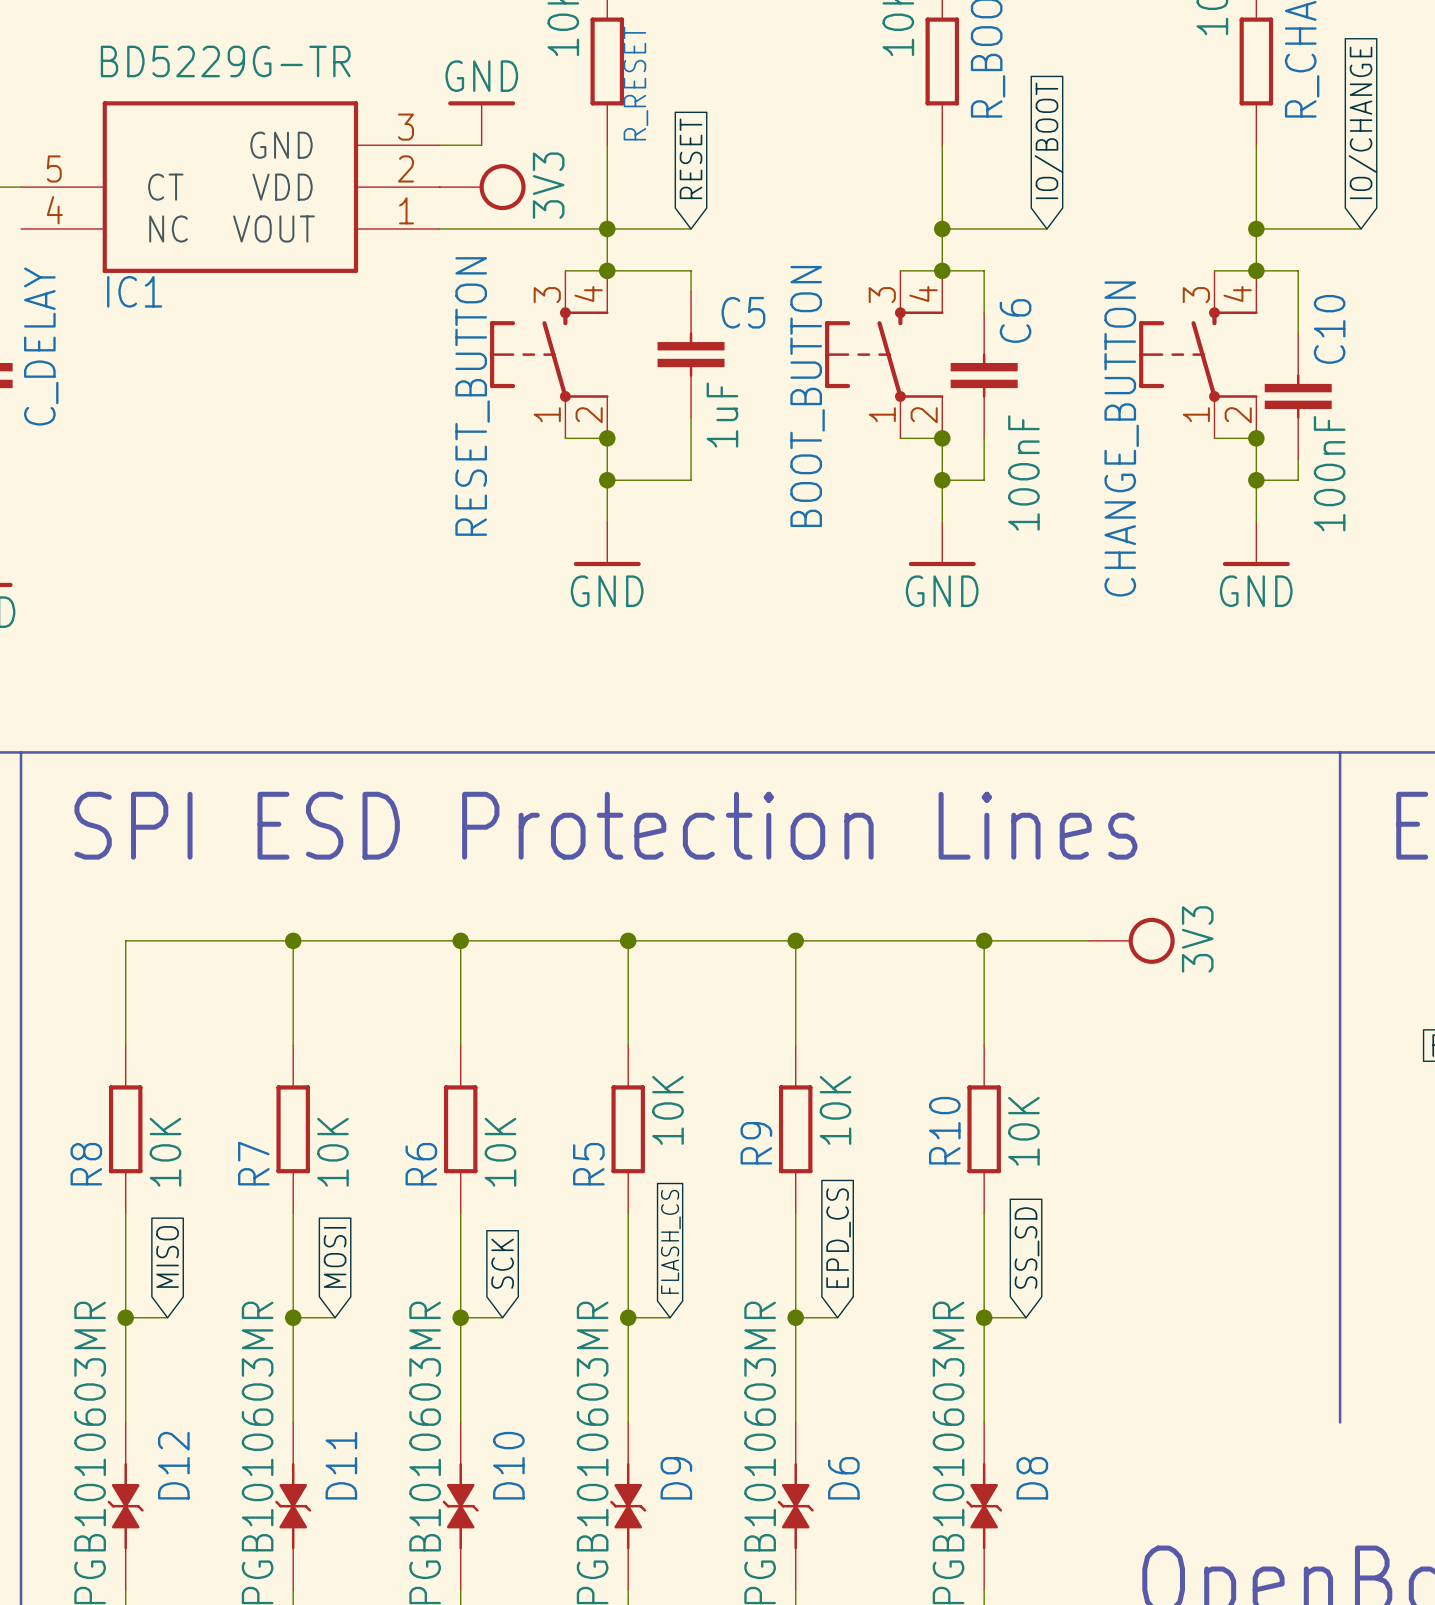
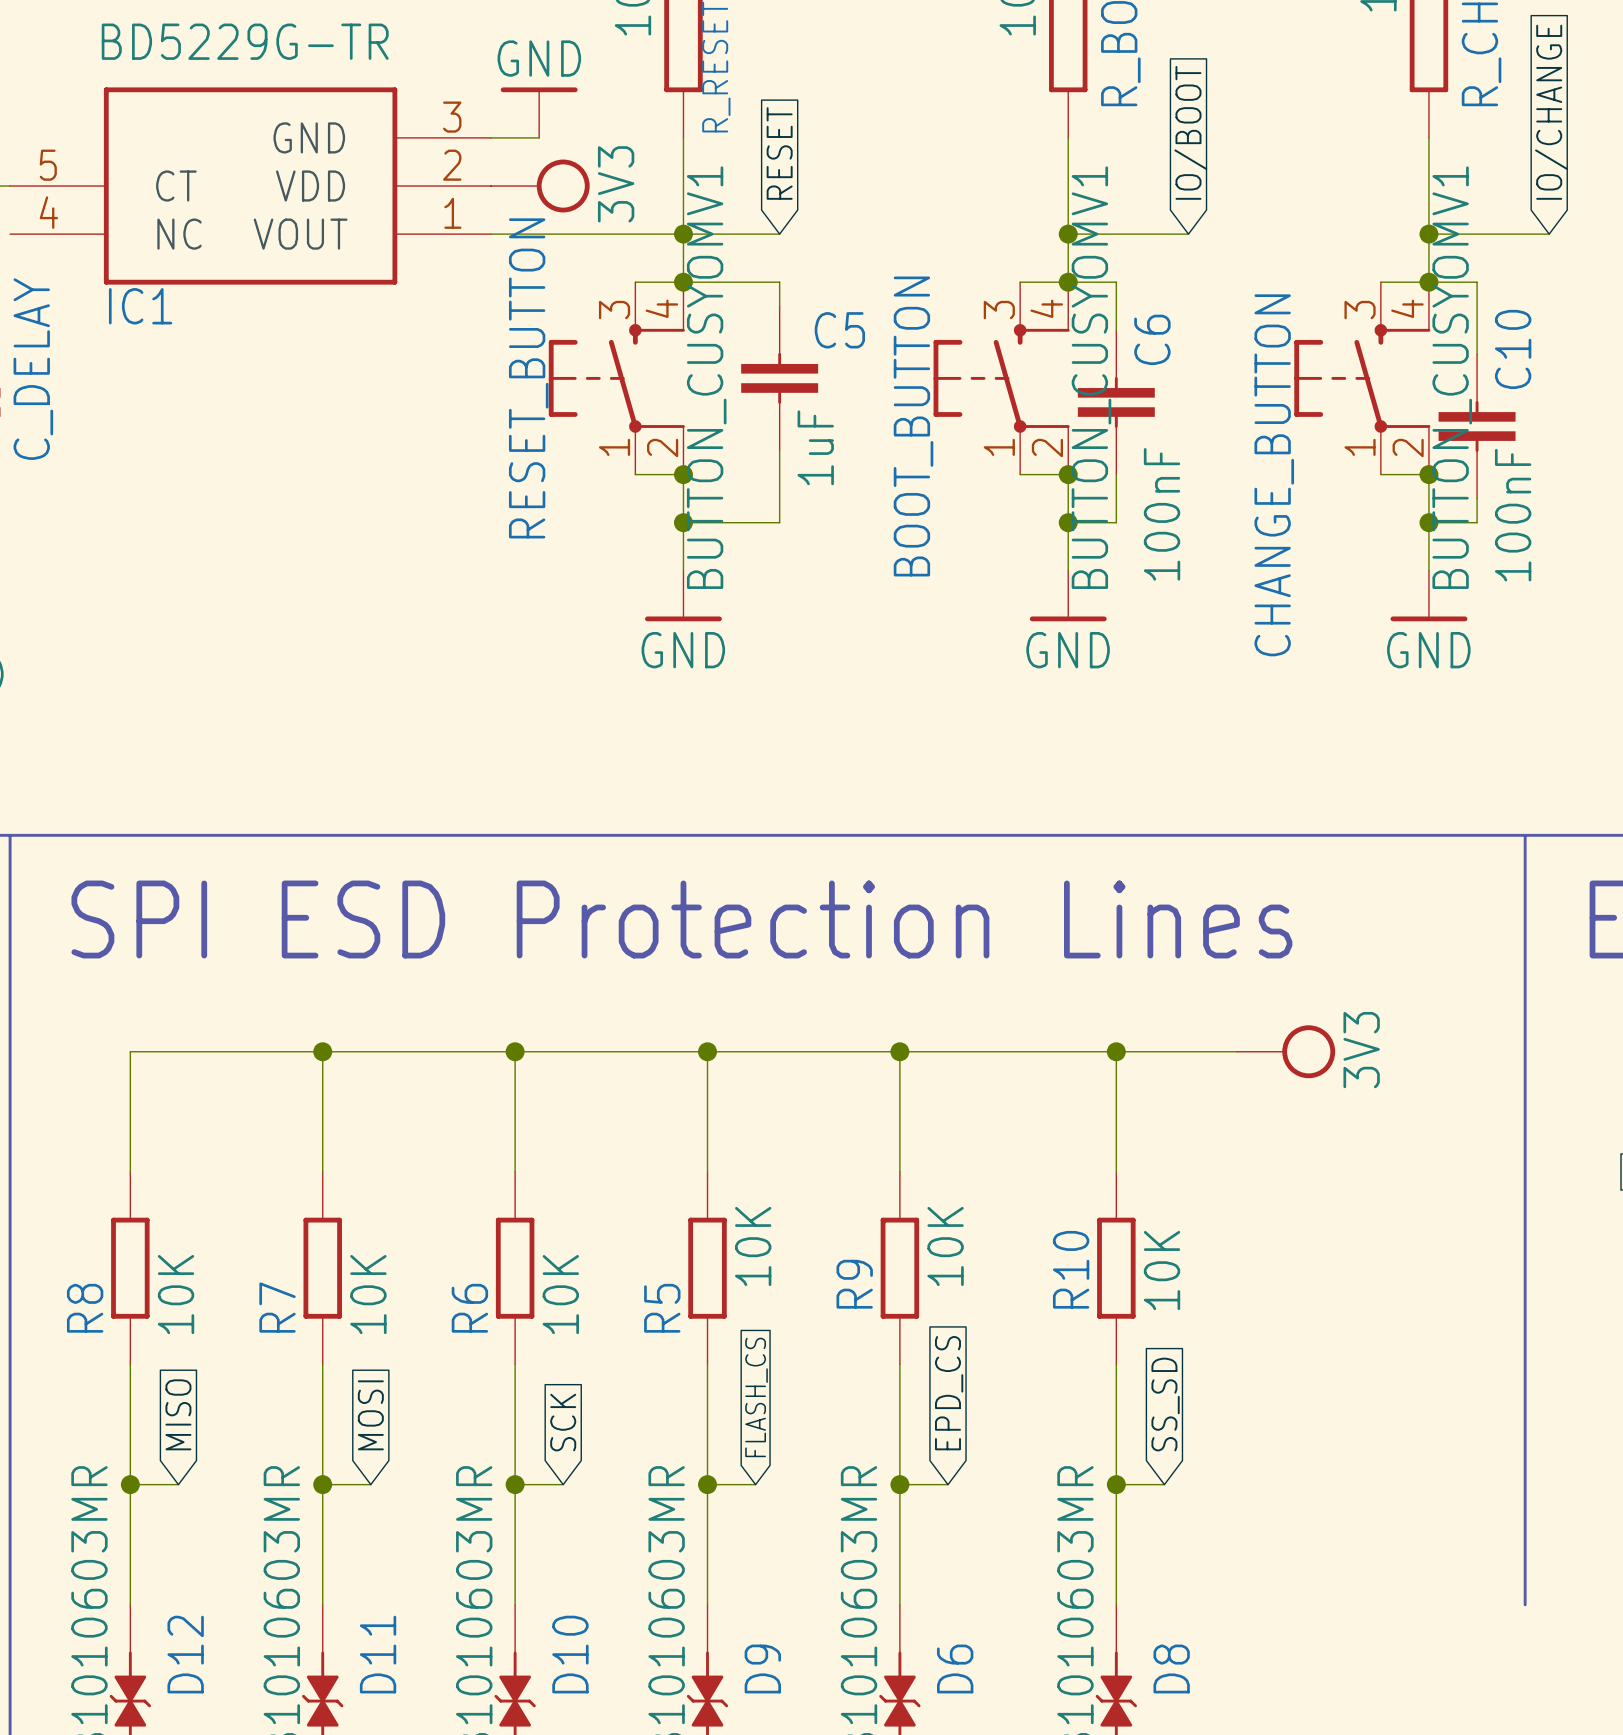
RESET_BUTTON value: none -> BUTTON_CUSYOMV1 (706, 377)
BOOT_BUTTON value: none -> BUTTON_CUSYOMV1 (1091, 377)
CHANGE_BUTTON value: none -> BUTTON_CUSYOMV1 (1452, 377)
RESET_BUTTON name position: RESET_BUTTON (472, 396) -> RESET_BUTTON (528, 378)

